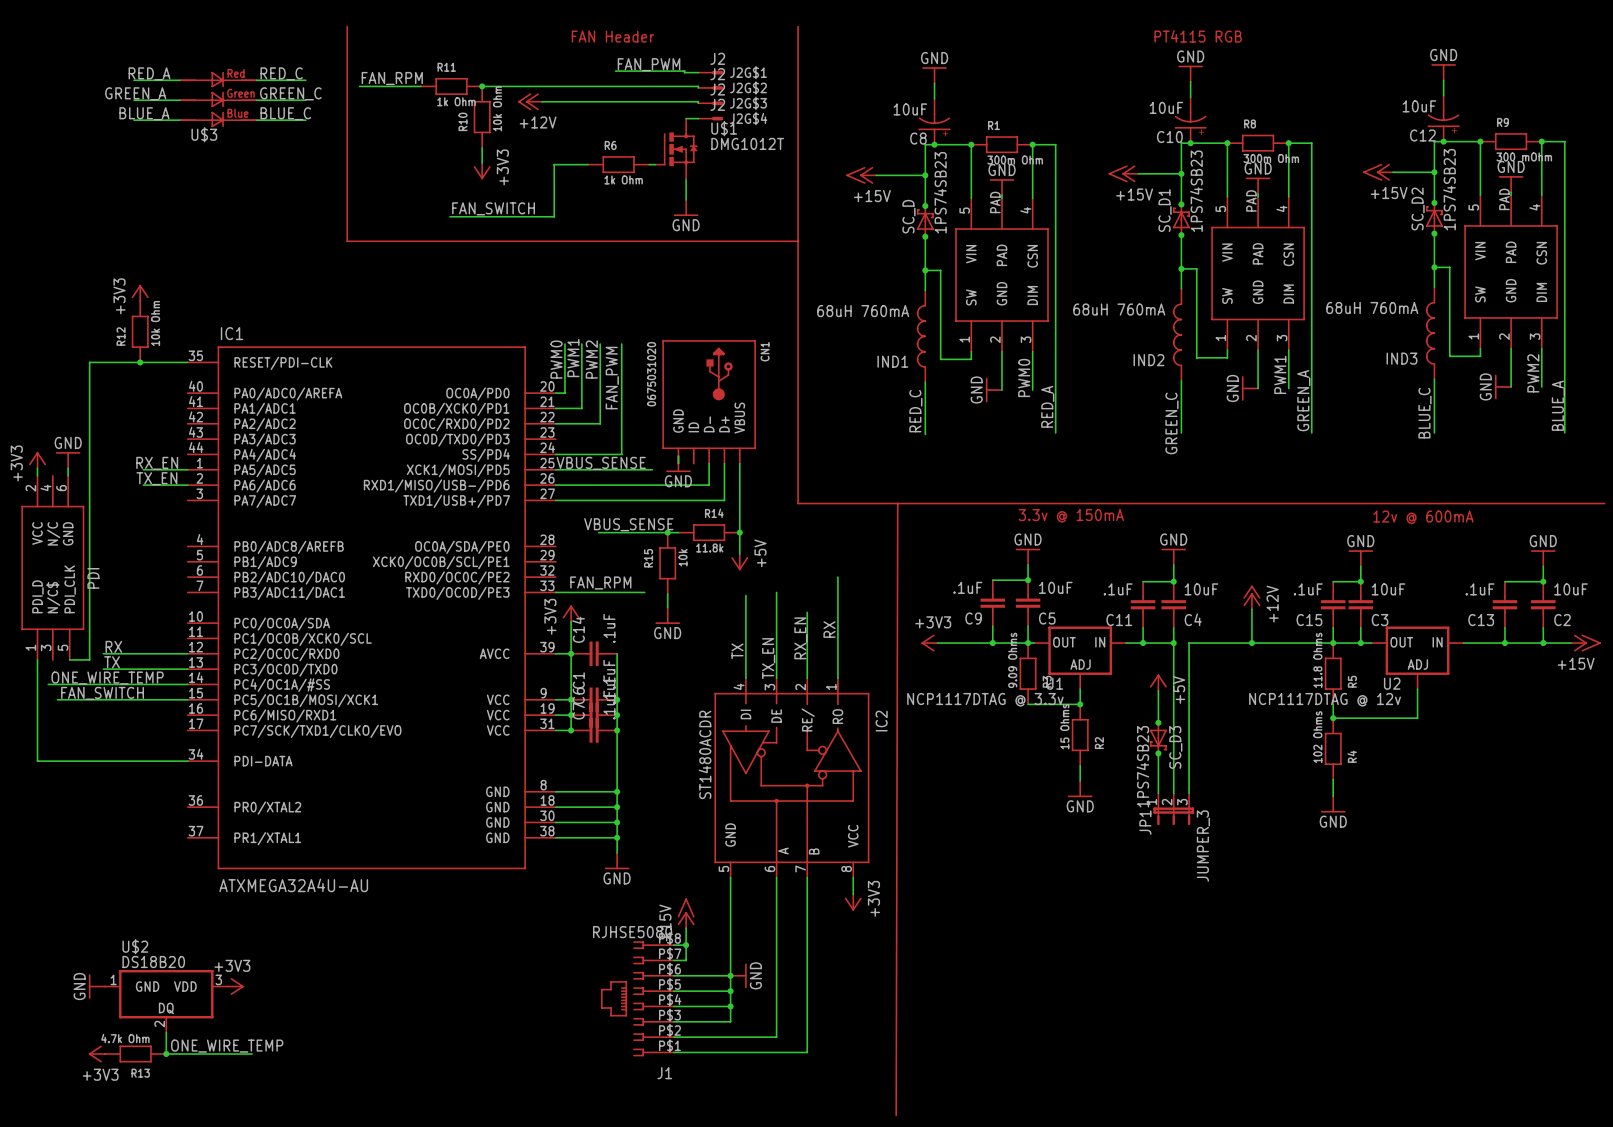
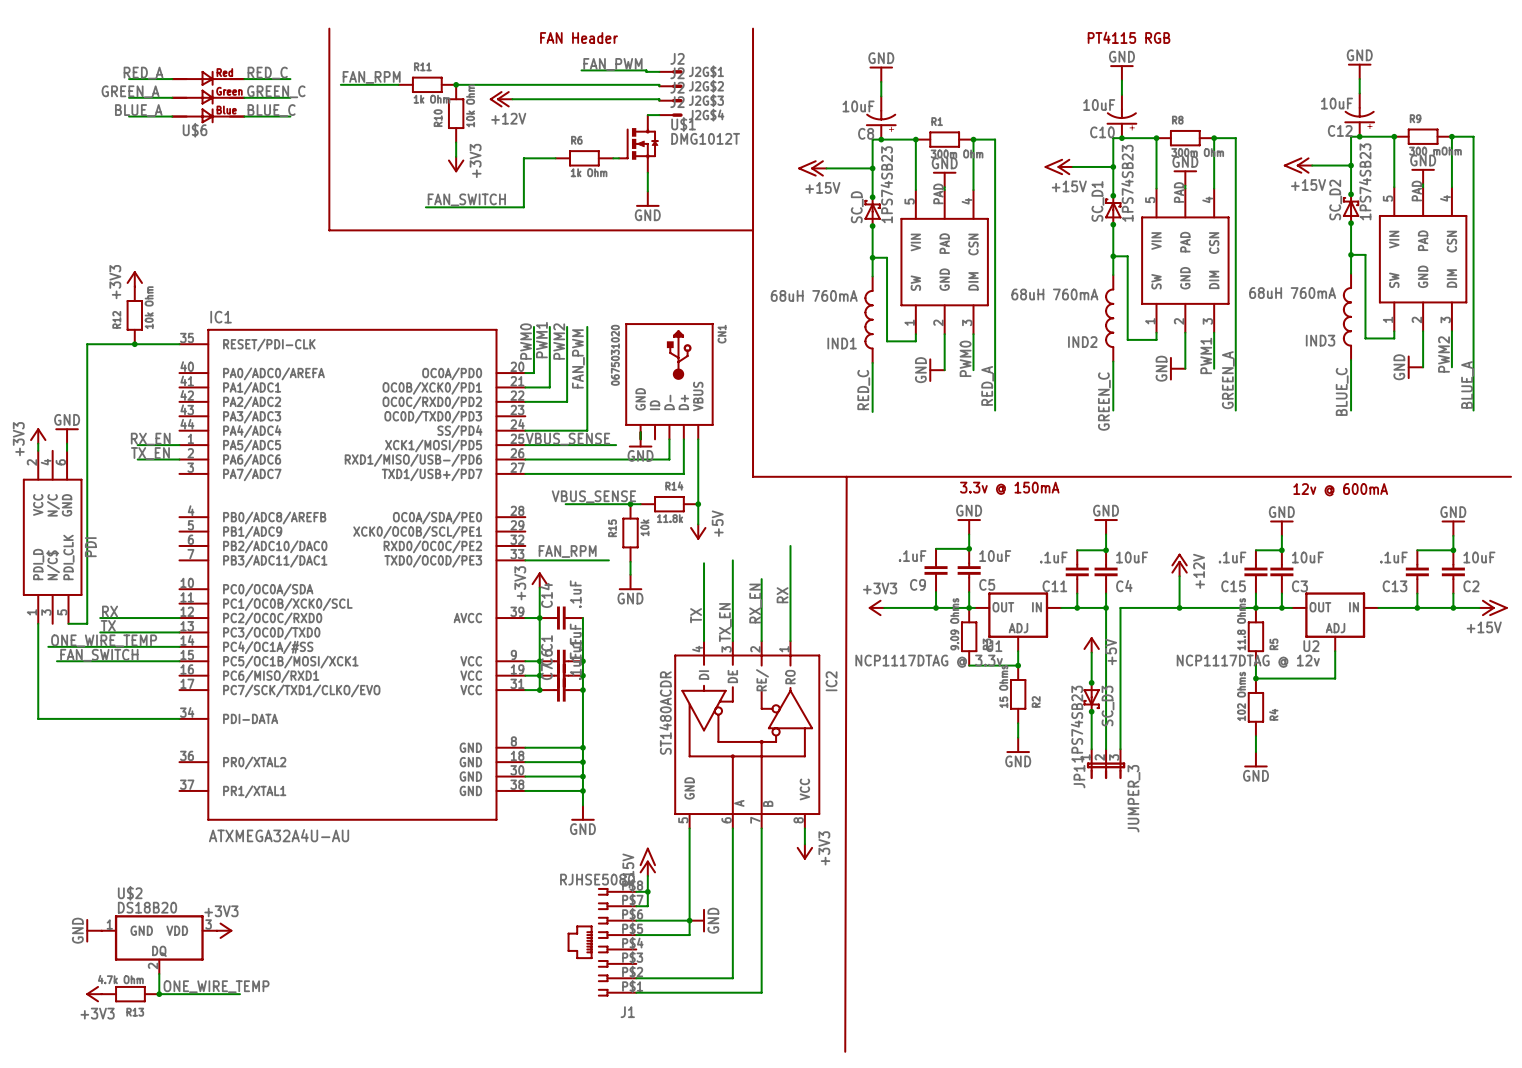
U$3 name: U$3 (204, 134) -> U$6 (195, 130)
wire: (730, 991) (730, 1021) (673, 1021) -> none
junction: (730, 991) -> none
wire: (673, 1006) (730, 1006) -> none
junction: (730, 1006) -> none

